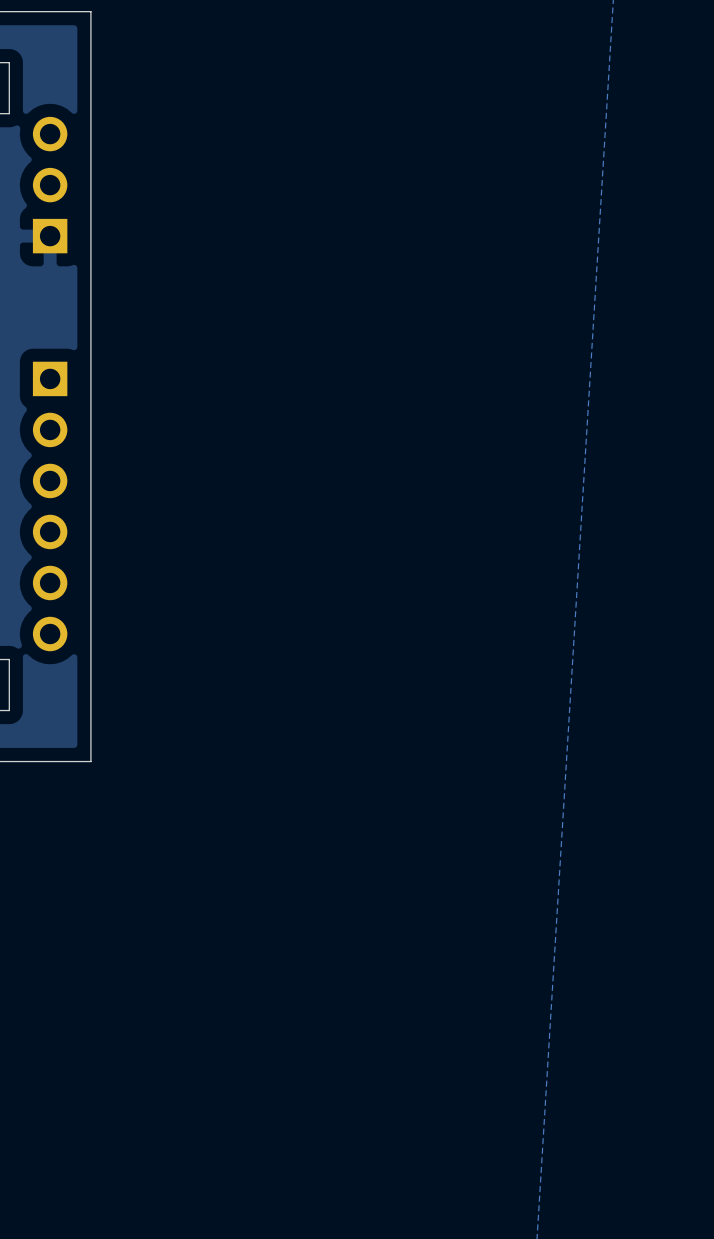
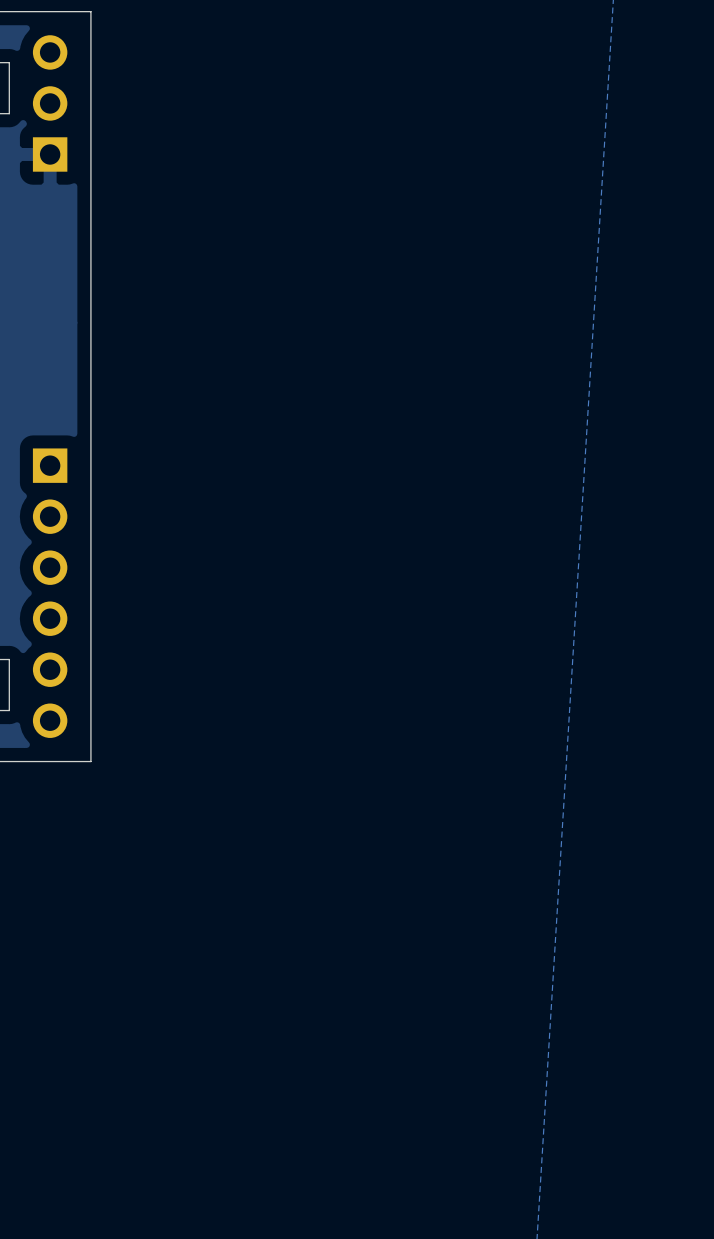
part position: (50, 185) -> (50, 103)
part position: (50, 506) -> (50, 593)

